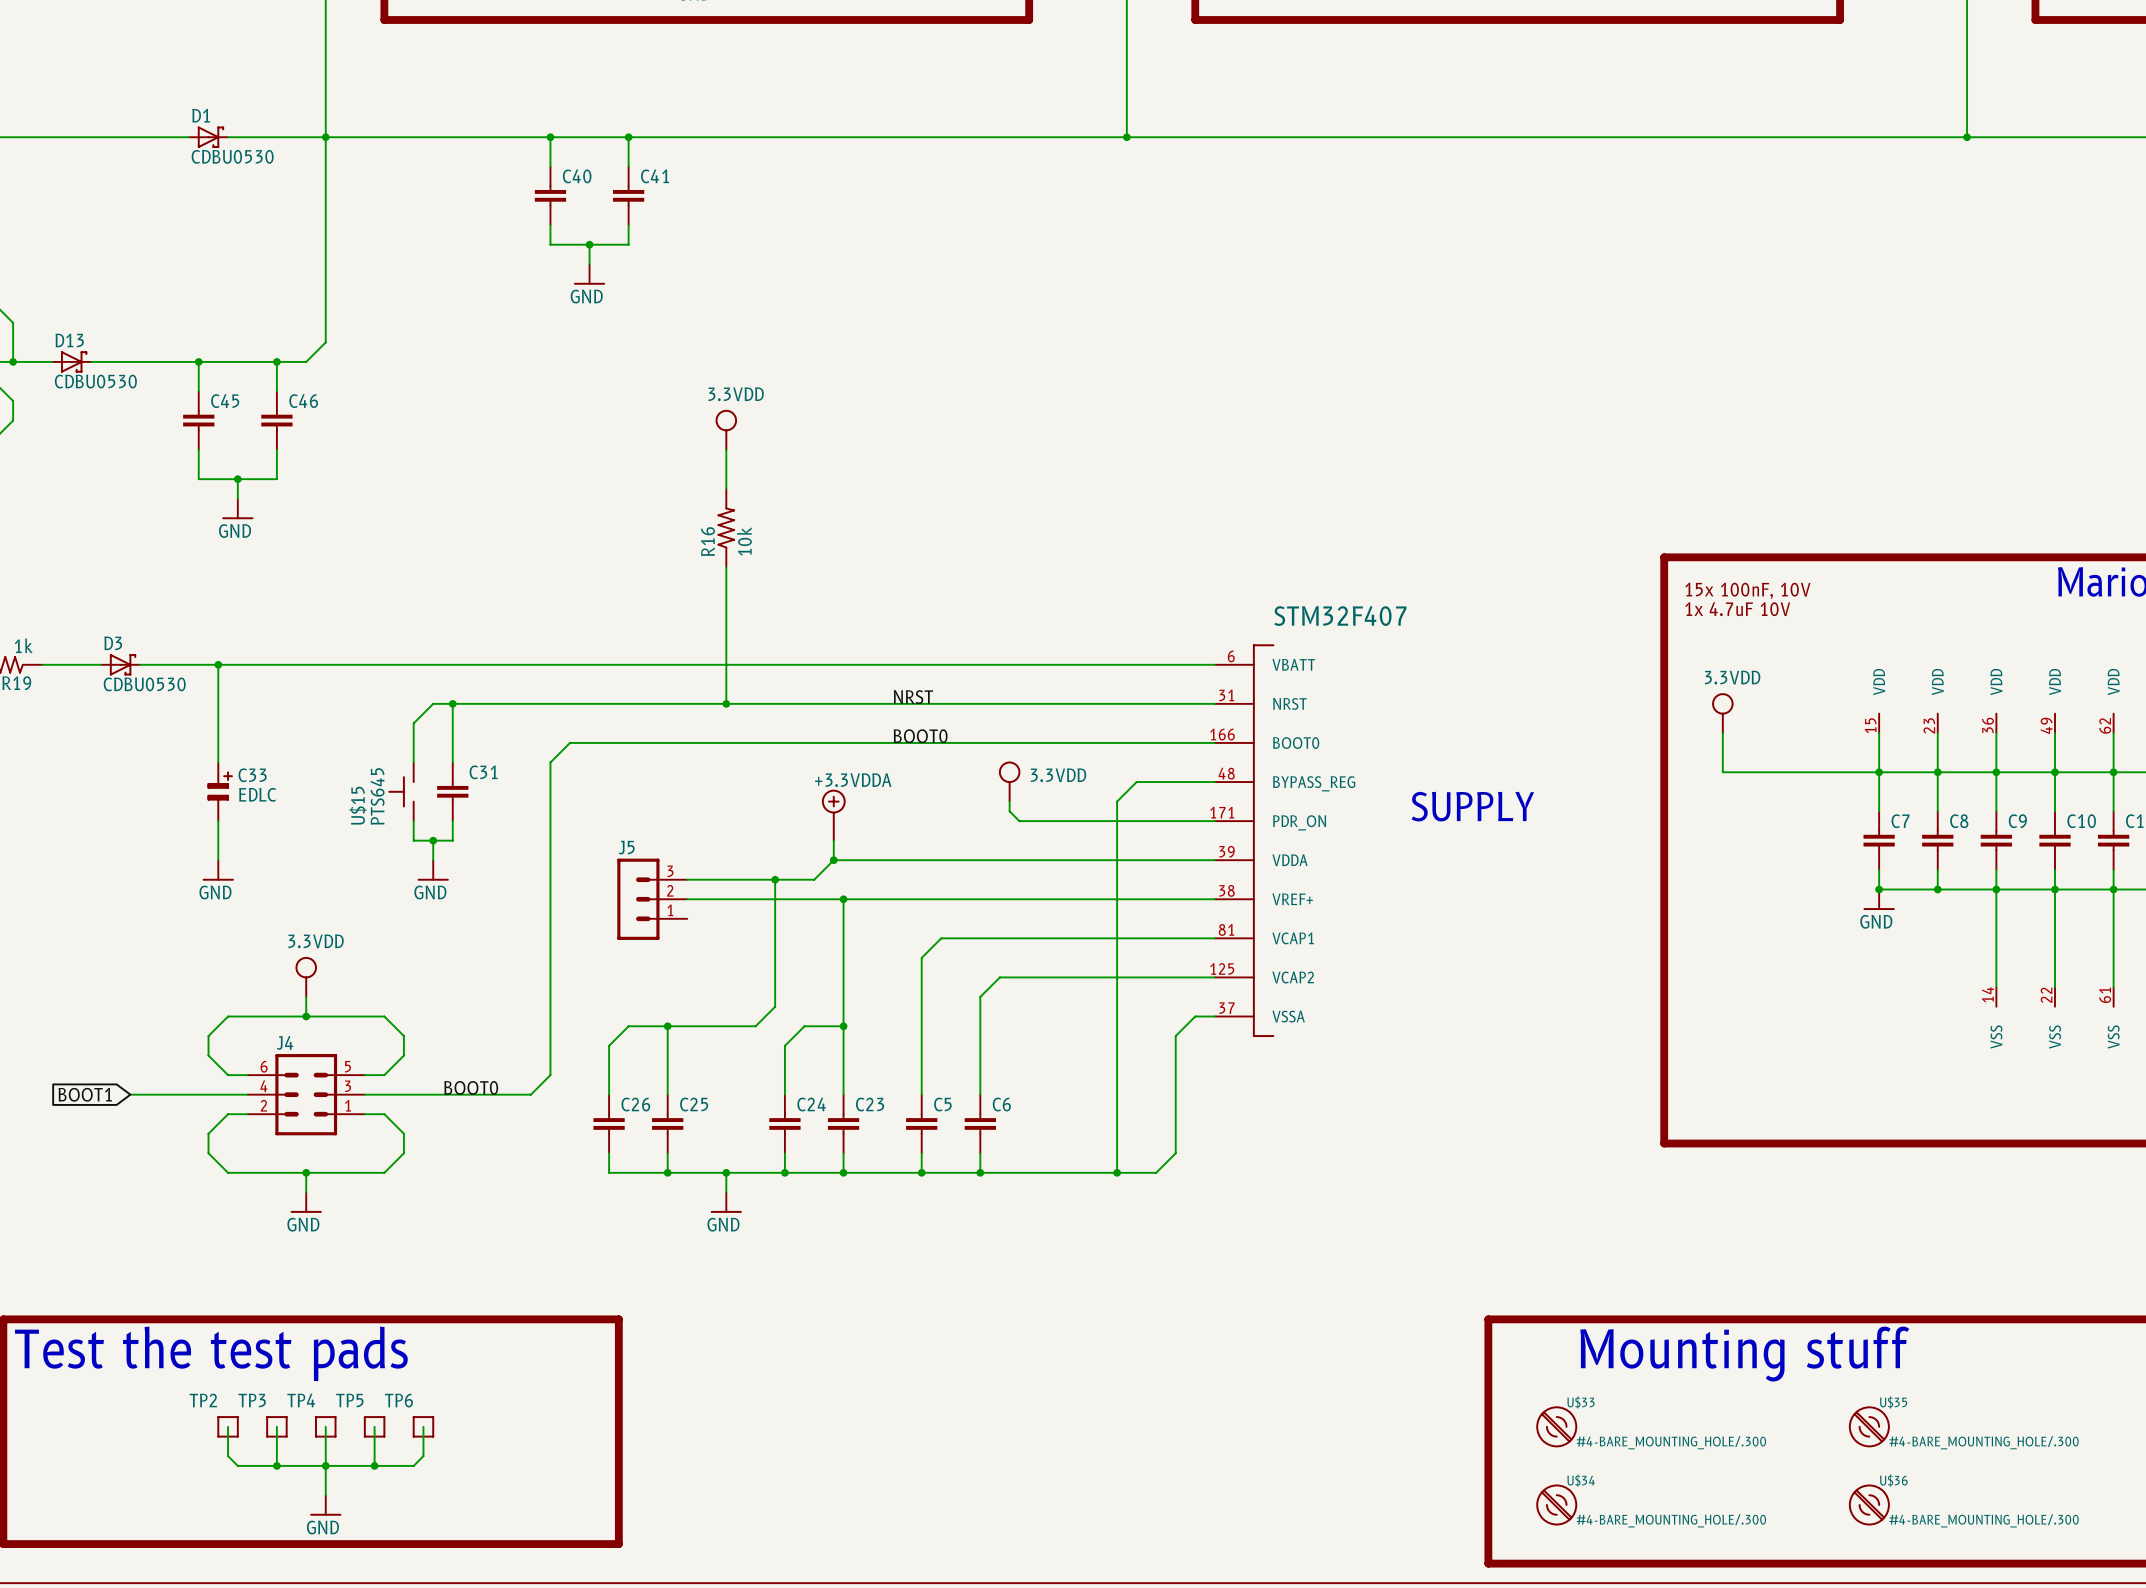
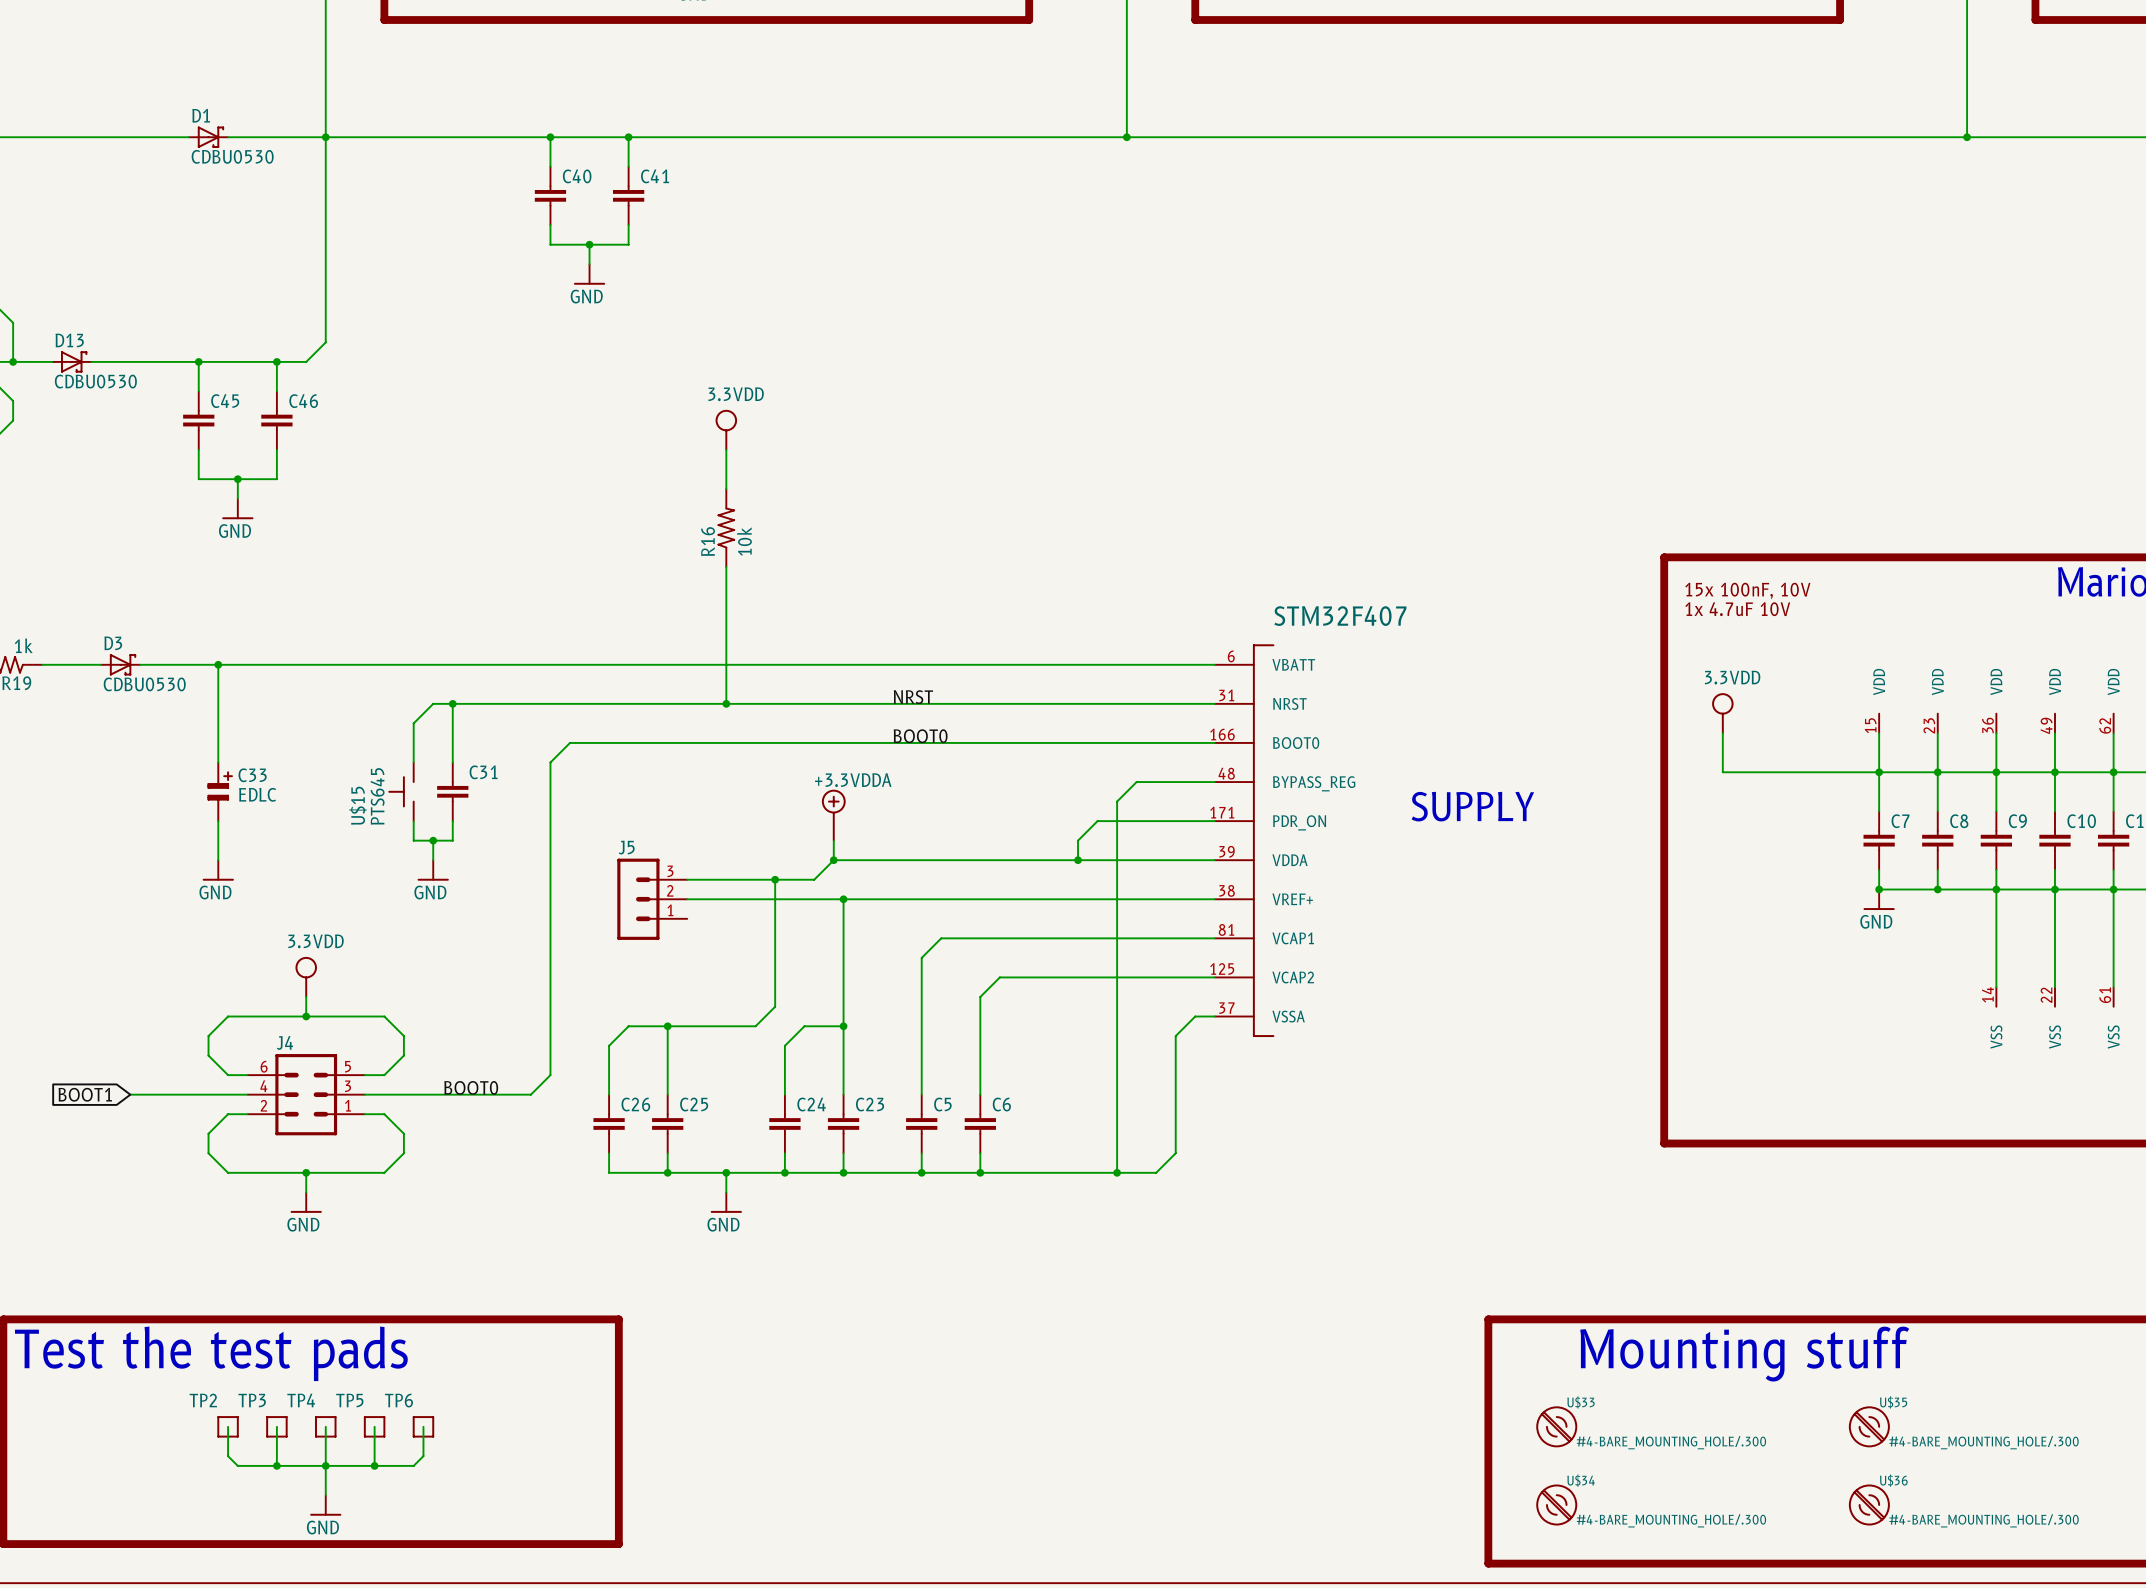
power symbol: 3.3VDD (1009, 782) -> none
wire: (1009, 801) (1009, 811) (1019, 821) (1097, 821) -> (1078, 860) (1078, 840) (1097, 821)
junction: none -> (1078, 860)

